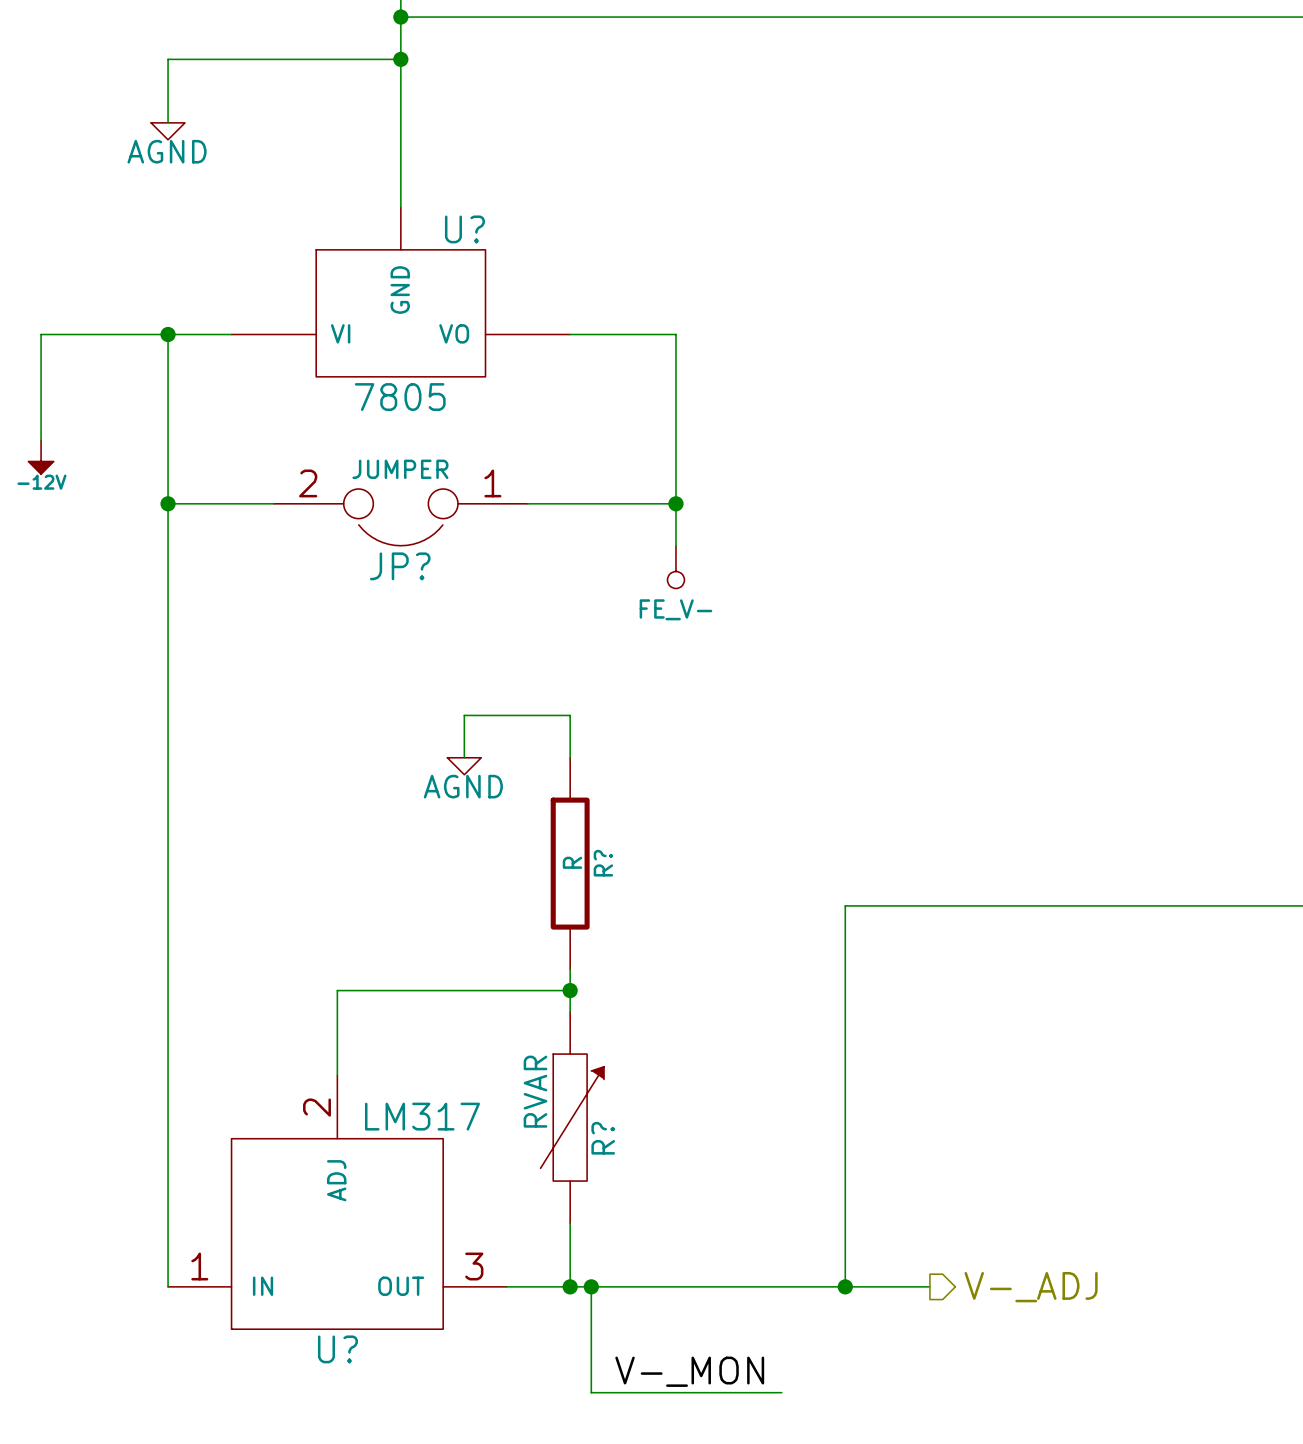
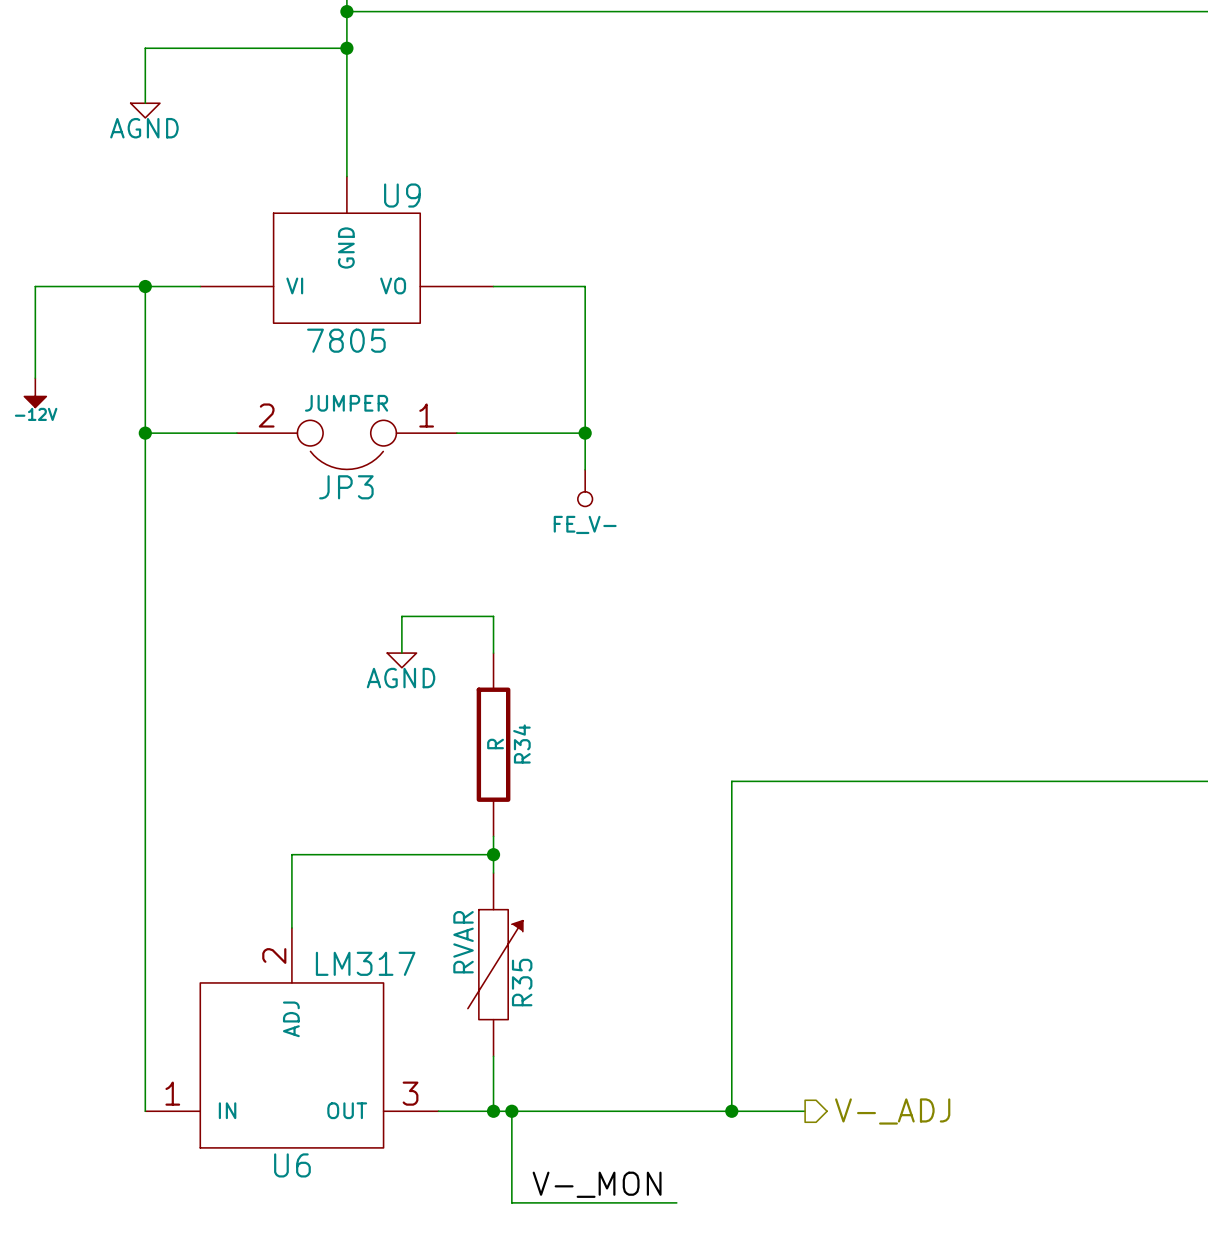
U? name: U? (464, 229) -> U9 (402, 195)
JP? name: JP? (400, 566) -> JP3 (346, 487)
R? name: R? (603, 863) -> R34 (521, 744)
R? name: R? (603, 1138) -> R35 (522, 982)
U? name: U? (337, 1349) -> U6 (292, 1165)

